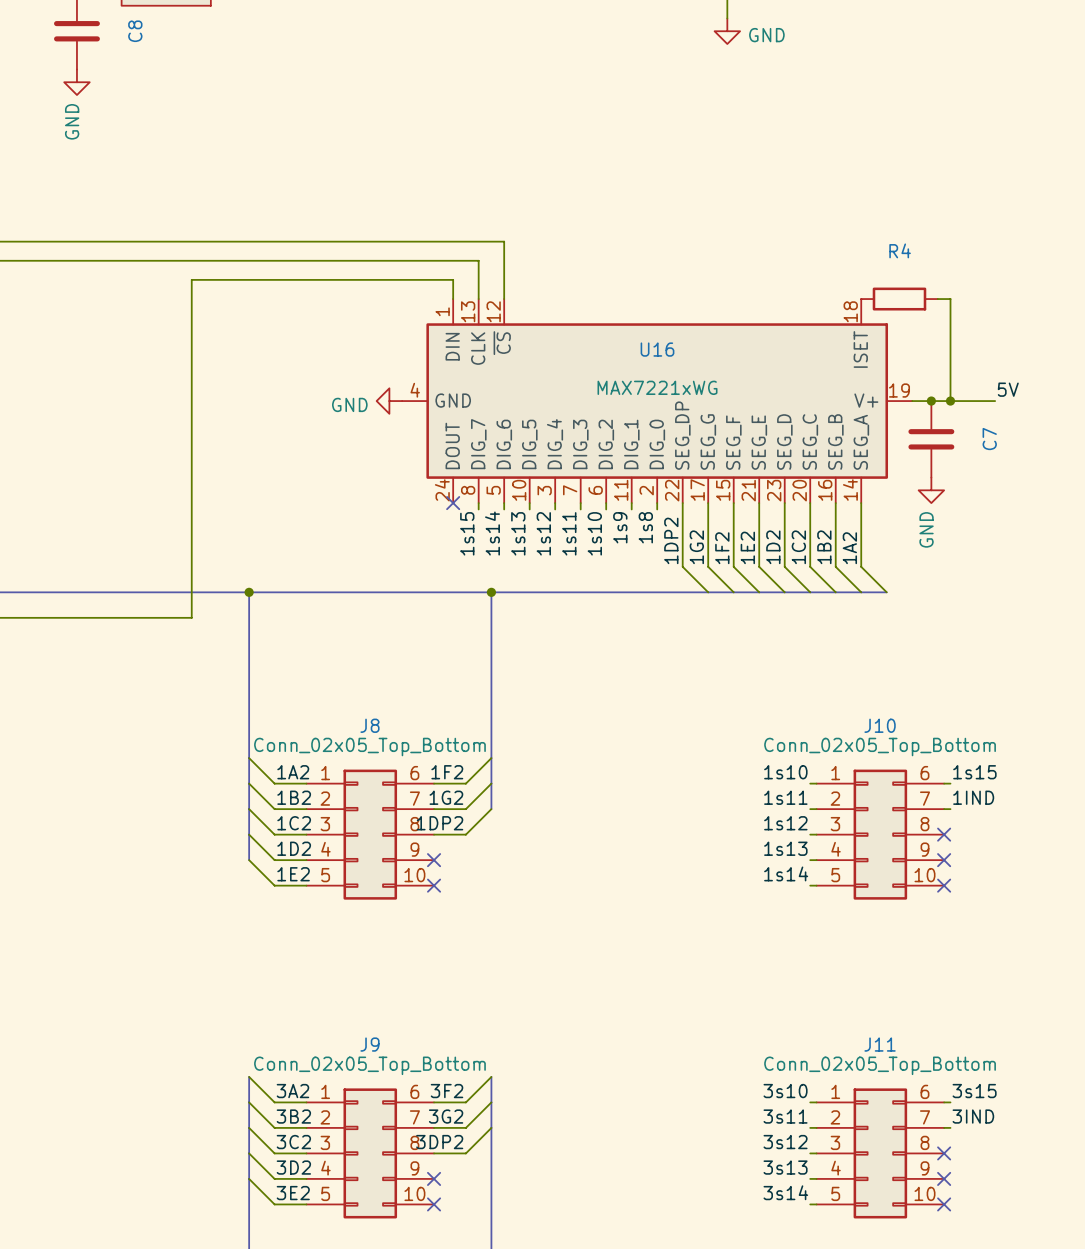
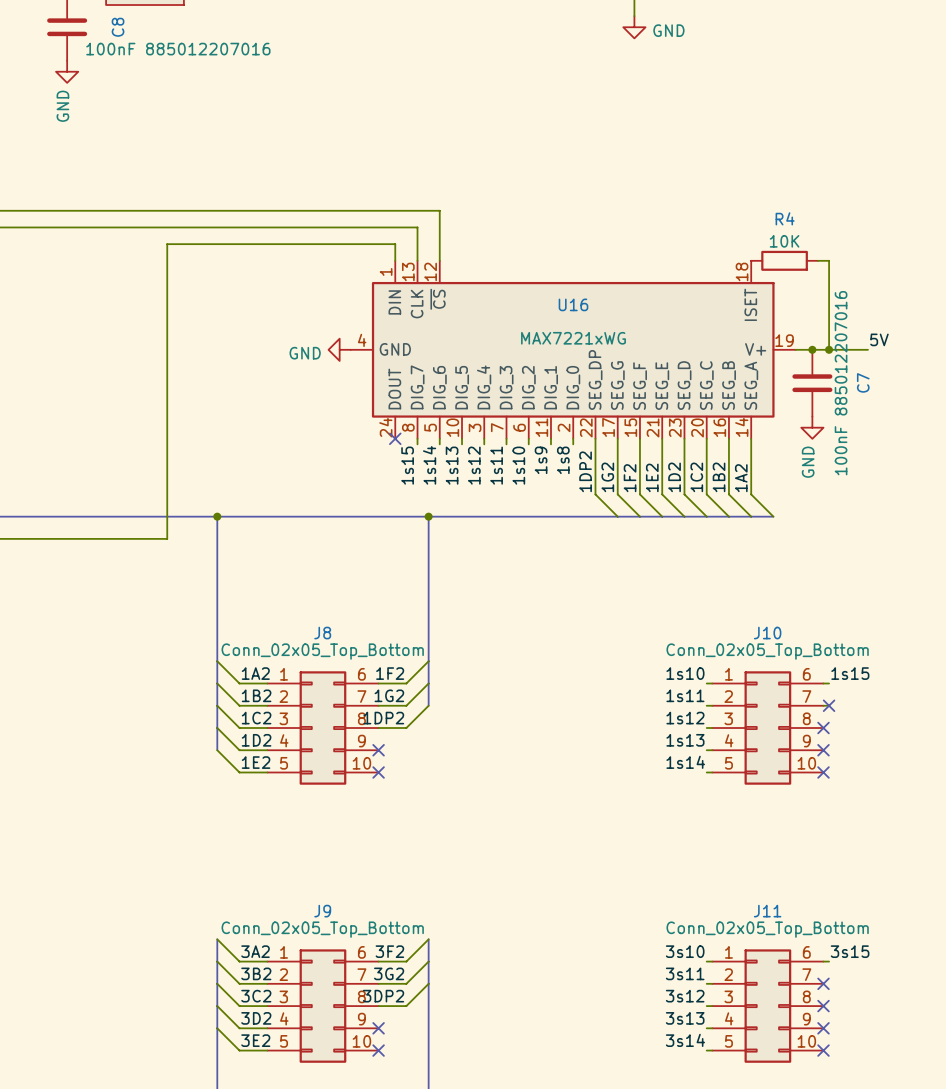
C8 value: none -> 100nF 885012207016 (178, 49)
R4 value: none -> 10K (784, 241)
C7 value: none -> 100nF 885012207016 (841, 383)
label: 1IND (973, 797) -> none
no-connect mark: none -> (829, 705)
label: 3IND (973, 1116) -> none
wire: (944, 1127) (950, 1127) -> none
no-connect mark: none -> (823, 983)

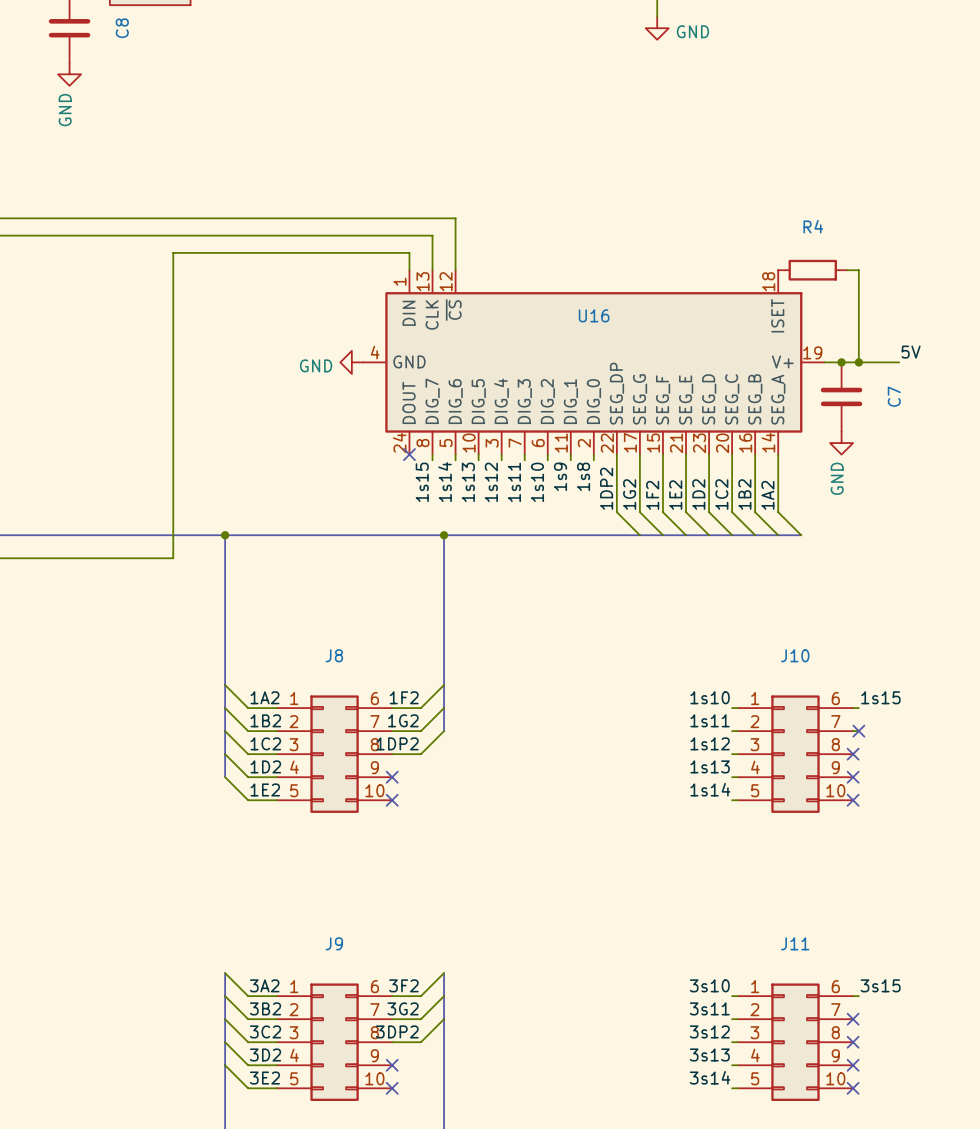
C8 value: 100nF 885012207016 (178, 49) -> none
R4 value: 10K (784, 241) -> none
U16 value: MAX7221xWG (573, 338) -> none
C7 value: 100nF 885012207016 (841, 383) -> none
J8 value: Conn_02x05_Top_Bottom (322, 651) -> none
J10 value: Conn_02x05_Top_Bottom (767, 651) -> none
J9 value: Conn_02x05_Top_Bottom (322, 929) -> none
J11 value: Conn_02x05_Top_Bottom (767, 929) -> none

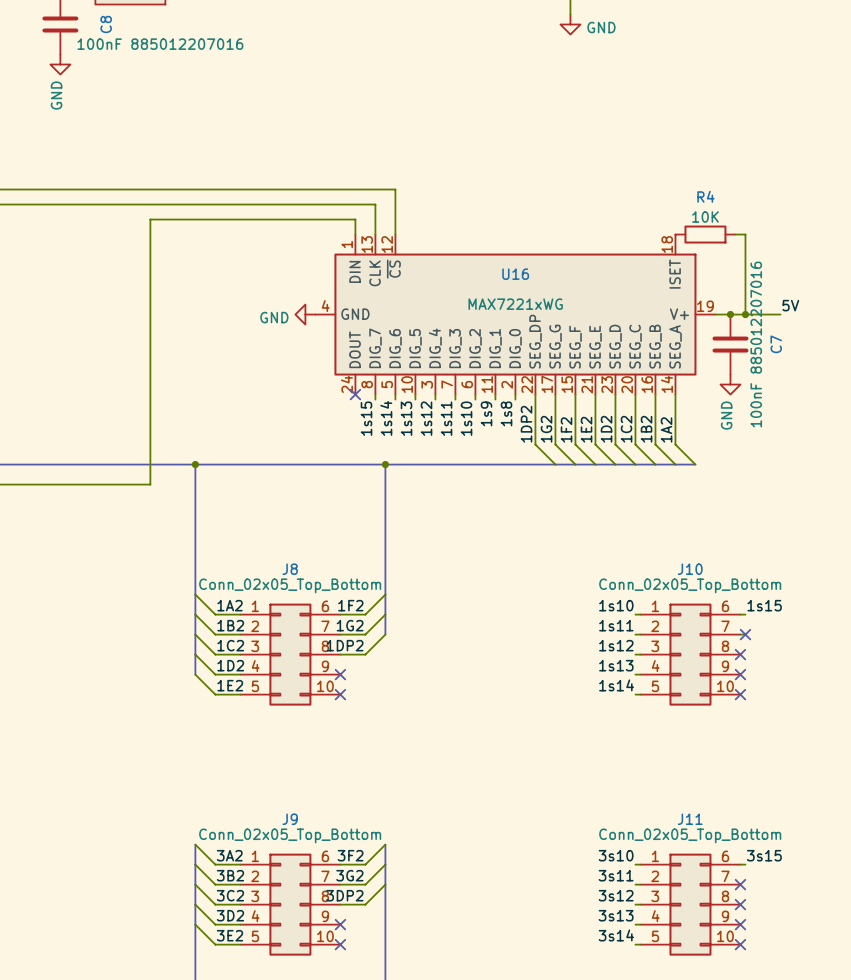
C8 value: none -> 100nF 885012207016 (160, 44)
R4 value: none -> 10K (705, 217)
U16 value: none -> MAX7221xWG (515, 304)
C7 value: none -> 100nF 885012207016 (756, 344)
J8 value: none -> Conn_02x05_Top_Bottom (290, 585)
J10 value: none -> Conn_02x05_Top_Bottom (690, 585)
J9 value: none -> Conn_02x05_Top_Bottom (290, 835)
J11 value: none -> Conn_02x05_Top_Bottom (690, 835)

